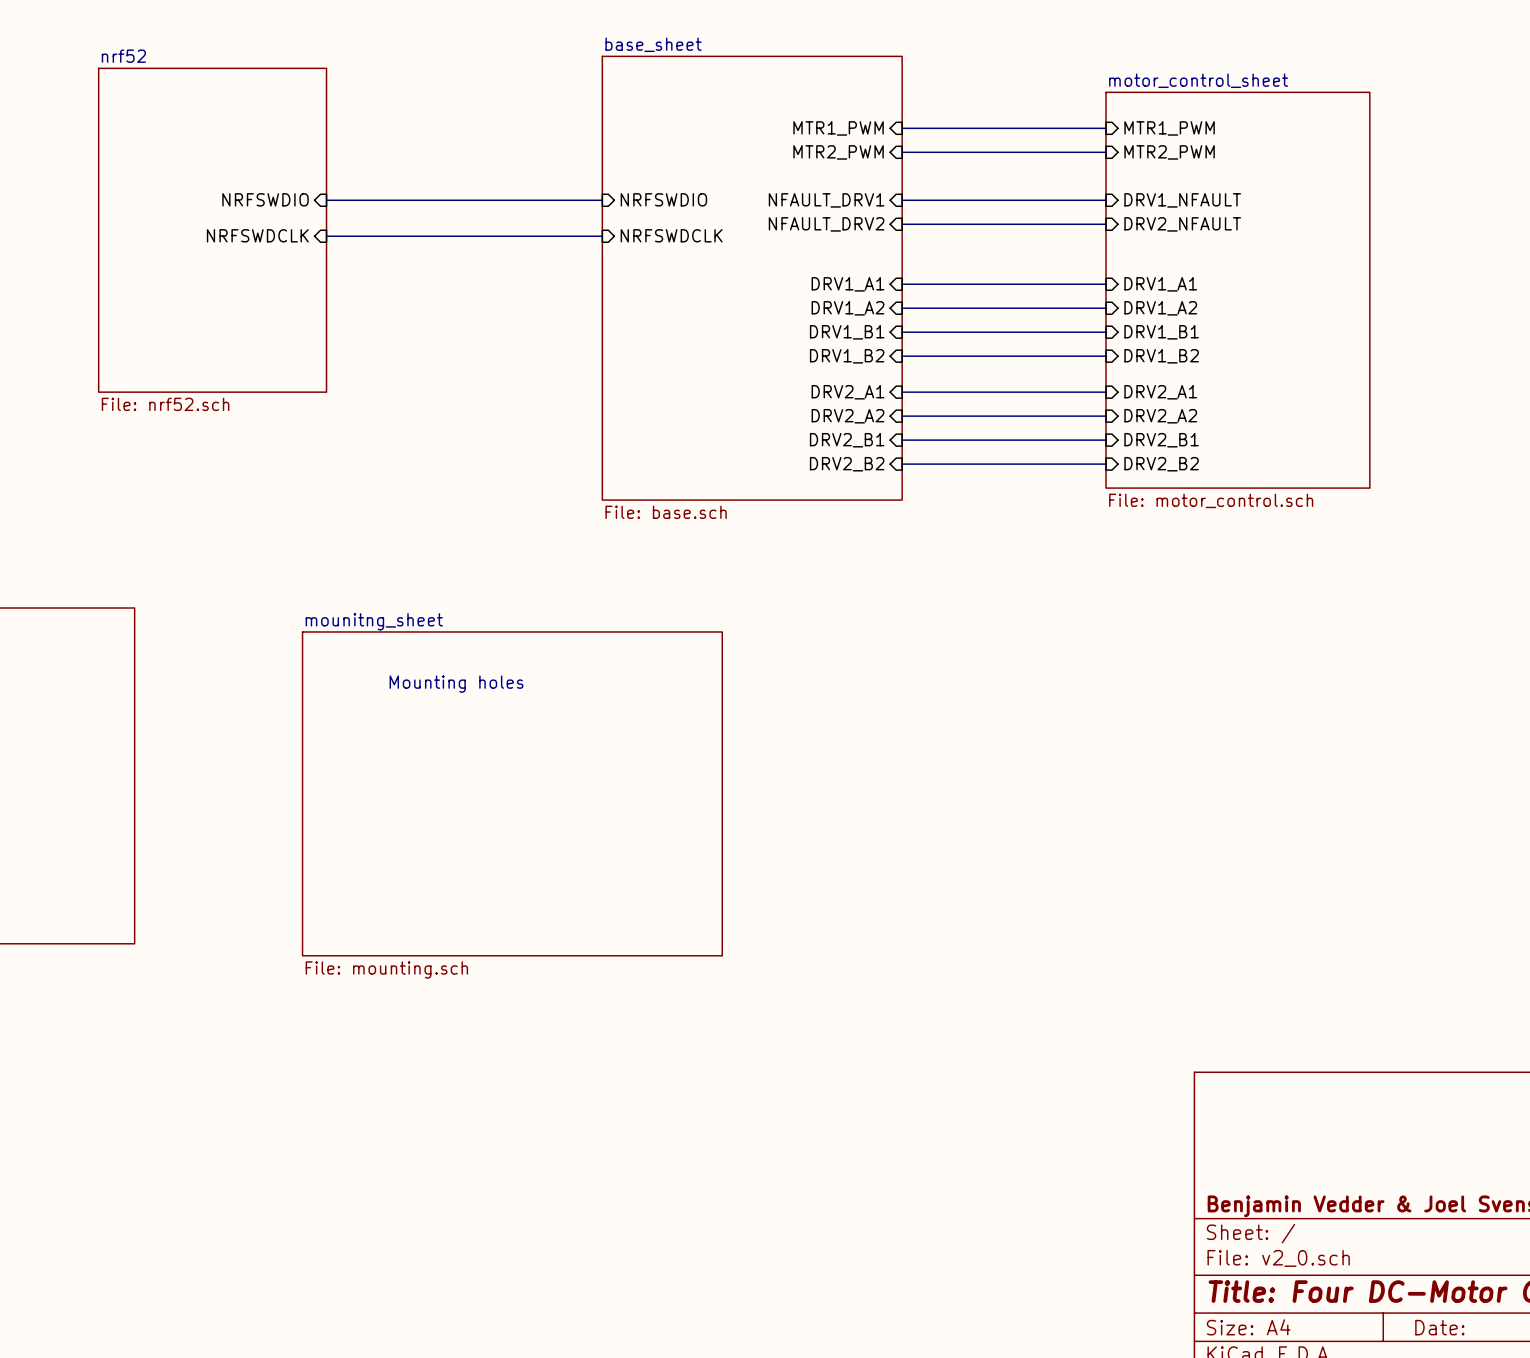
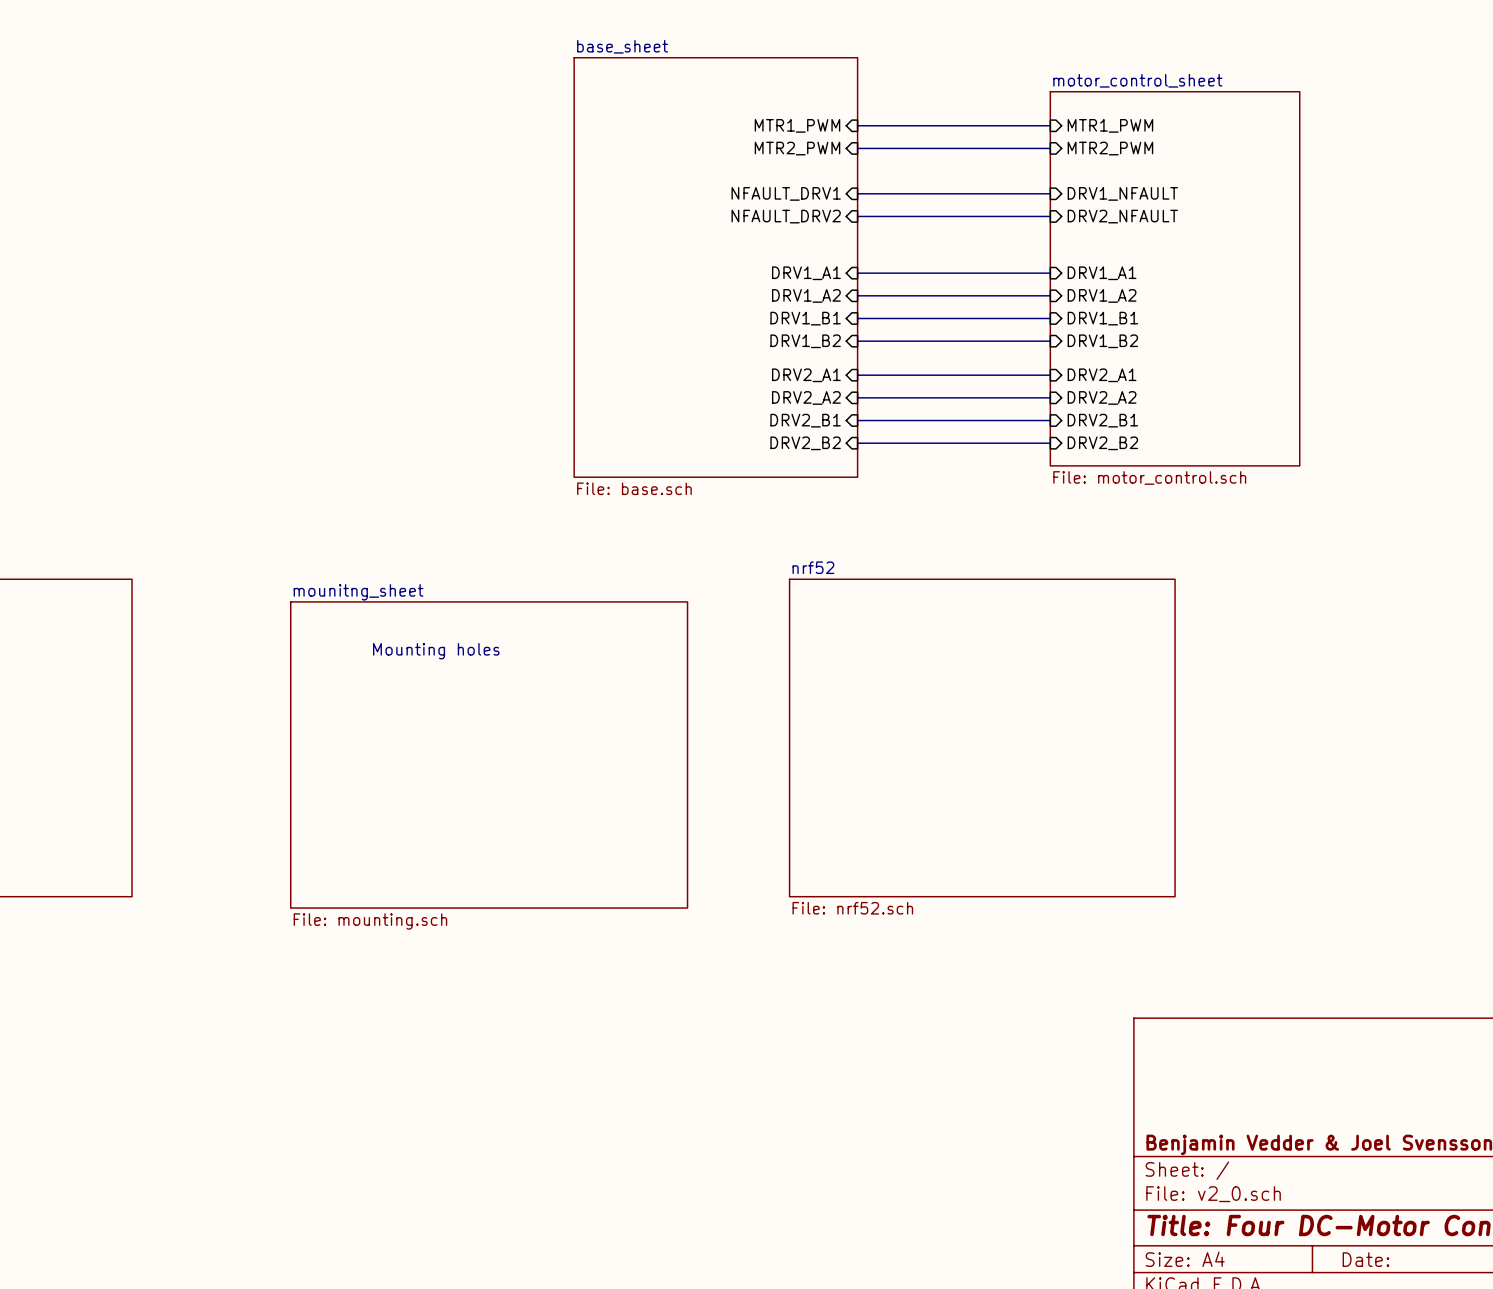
sheet nrf52 name position: nrf52 (123, 56) -> nrf52 (813, 567)
sheet nrf52 shape: [98, 68, 327, 393] -> [789, 579, 1176, 897]
sheet pin: NRFSWDIO (265, 199) -> none
sheet pin: NRFSWDIO (663, 199) -> none
wire: (326, 200) (602, 200) -> none
sheet pin: NRFSWDCLK (257, 235) -> none
sheet pin: NRFSWDCLK (671, 235) -> none
wire: (326, 236) (602, 236) -> none
sheet nrf52 value position: File: nrf52.sch (165, 404) -> File: nrf52.sch (852, 908)

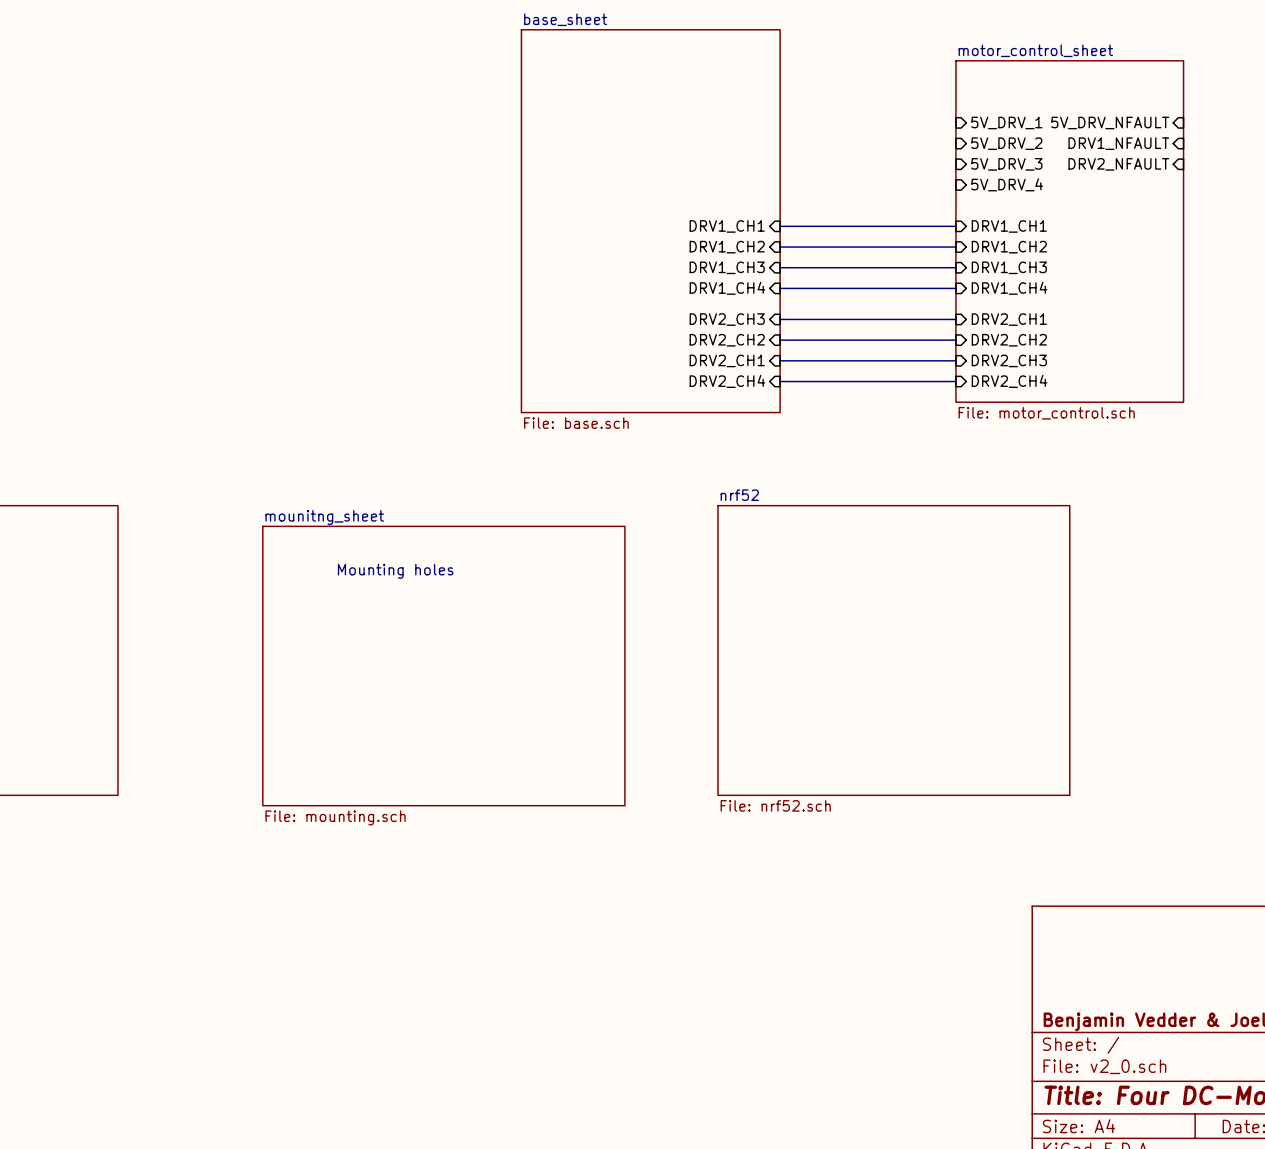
sheet pin: MTR1_PWM (797, 125) -> none
wire: (857, 125) (1050, 125) -> none
sheet pin: MTR1_PWM (1110, 125) -> none
sheet pin: MTR2_PWM (797, 148) -> none
wire: (857, 148) (1050, 148) -> none
sheet pin: MTR2_PWM (1110, 148) -> none
sheet pin: none -> 5V_DRV_1 (1006, 122)
sheet pin: none -> 5V_DRV_NFAULT (1110, 122)
sheet pin: none -> 5V_DRV_2 (1006, 143)
sheet pin: NFAULT_DRV1 (786, 193) -> none
wire: (857, 193) (1050, 193) -> none
sheet pin rotation: 0° (1122, 193) -> 180° (1118, 143)
sheet pin: none -> 5V_DRV_3 (1006, 164)
sheet pin: NFAULT_DRV2 (786, 216) -> none
wire: (857, 216) (1050, 216) -> none
sheet pin rotation: 0° (1122, 216) -> 180° (1118, 164)
sheet pin: none -> 5V_DRV_4 (1007, 184)
sheet pin: DRV1_A1 (806, 273) -> DRV1_CH1 (727, 226)
sheet pin: DRV1_A1 (1102, 273) -> DRV1_CH1 (1009, 226)
sheet pin: DRV1_A2 (806, 295) -> DRV1_CH2 (727, 247)
sheet pin: DRV1_A2 (1102, 295) -> DRV1_CH2 (1009, 247)
sheet pin: DRV1_B1 (805, 318) -> DRV1_CH3 (727, 267)
sheet pin: DRV1_B1 (1102, 318) -> DRV1_CH3 (1009, 267)
sheet pin: DRV1_B2 (805, 341) -> DRV1_CH4 (727, 288)
sheet pin: DRV1_B2 (1102, 341) -> DRV1_CH4 (1009, 288)
sheet pin: DRV2_A1 (806, 375) -> DRV2_CH3 (727, 319)
sheet pin: DRV2_A1 (1102, 375) -> DRV2_CH1 (1009, 319)
sheet pin: DRV2_A2 (806, 397) -> DRV2_CH2 (727, 340)
sheet pin: DRV2_A2 (1102, 397) -> DRV2_CH2 (1009, 340)
sheet pin: DRV2_B1 (805, 420) -> DRV2_CH1 (727, 360)
sheet pin: DRV2_B1 (1102, 420) -> DRV2_CH3 (1009, 360)
sheet pin: DRV2_B2 (805, 443) -> DRV2_CH4 (727, 381)
sheet pin: DRV2_B2 (1102, 443) -> DRV2_CH4 (1009, 381)

